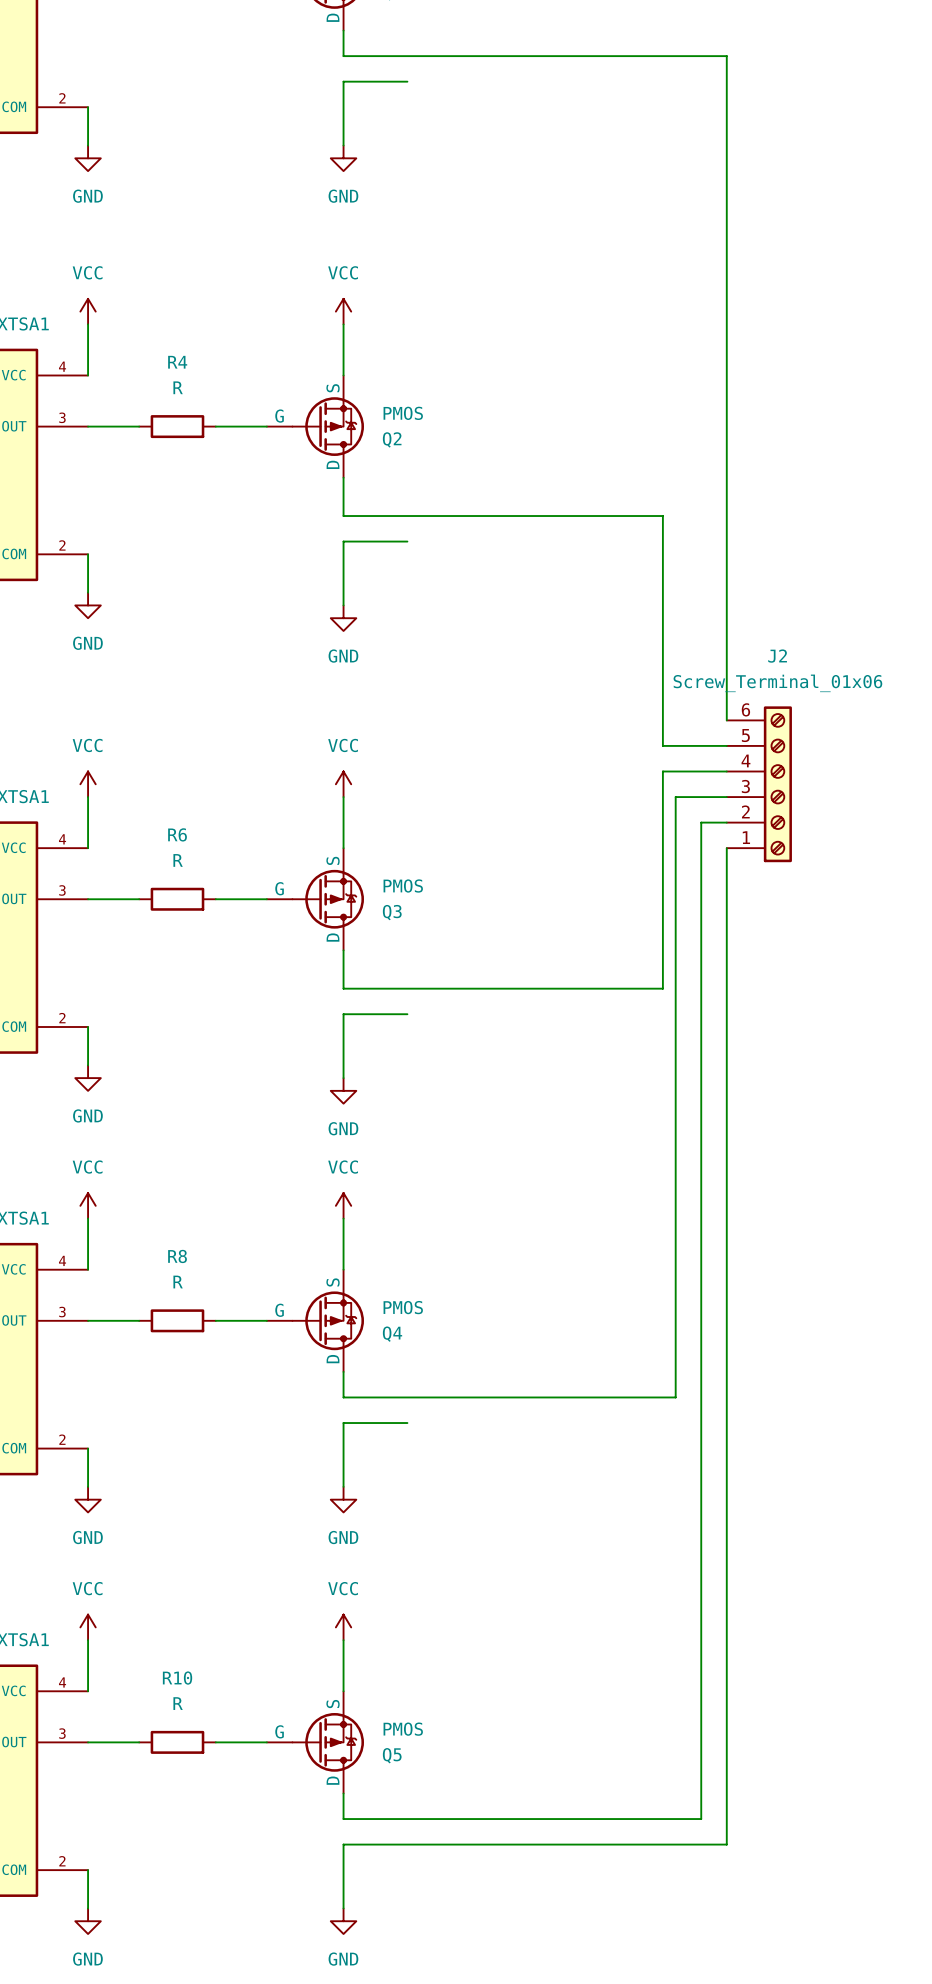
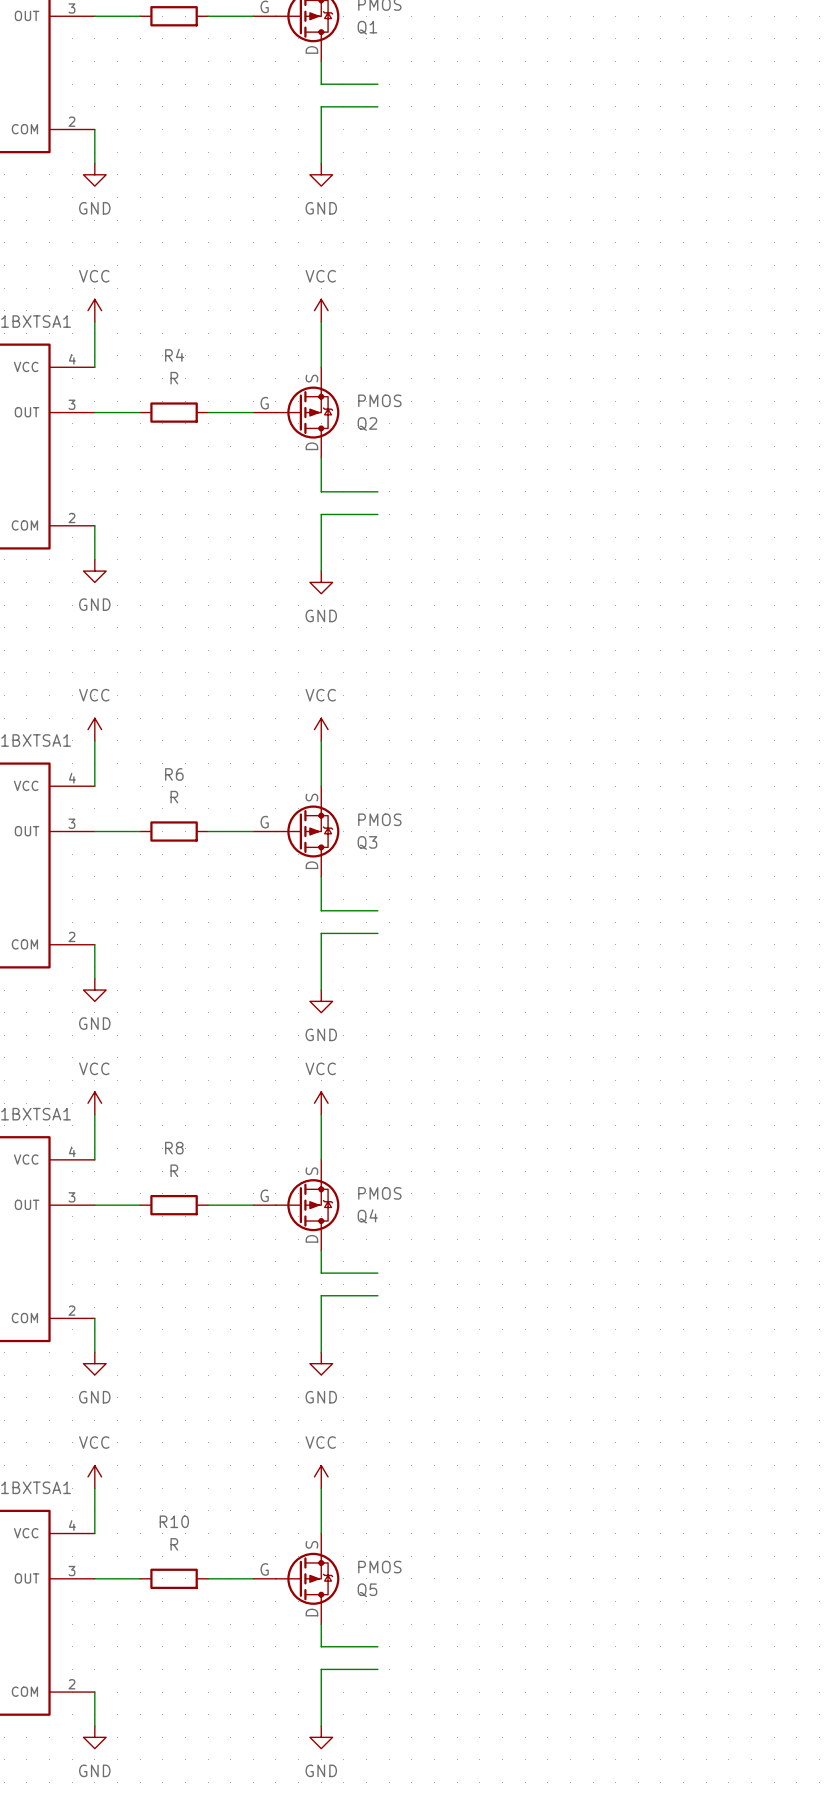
wire: (407, 56) (726, 56) (726, 720) -> none
wire: (407, 516) (662, 516) (662, 745) (726, 745) -> none
wire: (726, 771) (662, 771) (662, 988) (407, 988) -> none
J2: Screw_Terminal_01x06 (759, 784) -> none
wire: (726, 797) (675, 797) (675, 1397) (407, 1397) -> none
wire: (726, 822) (701, 822) (701, 1819) (407, 1819) -> none
wire: (726, 848) (726, 1844) (407, 1844) -> none

